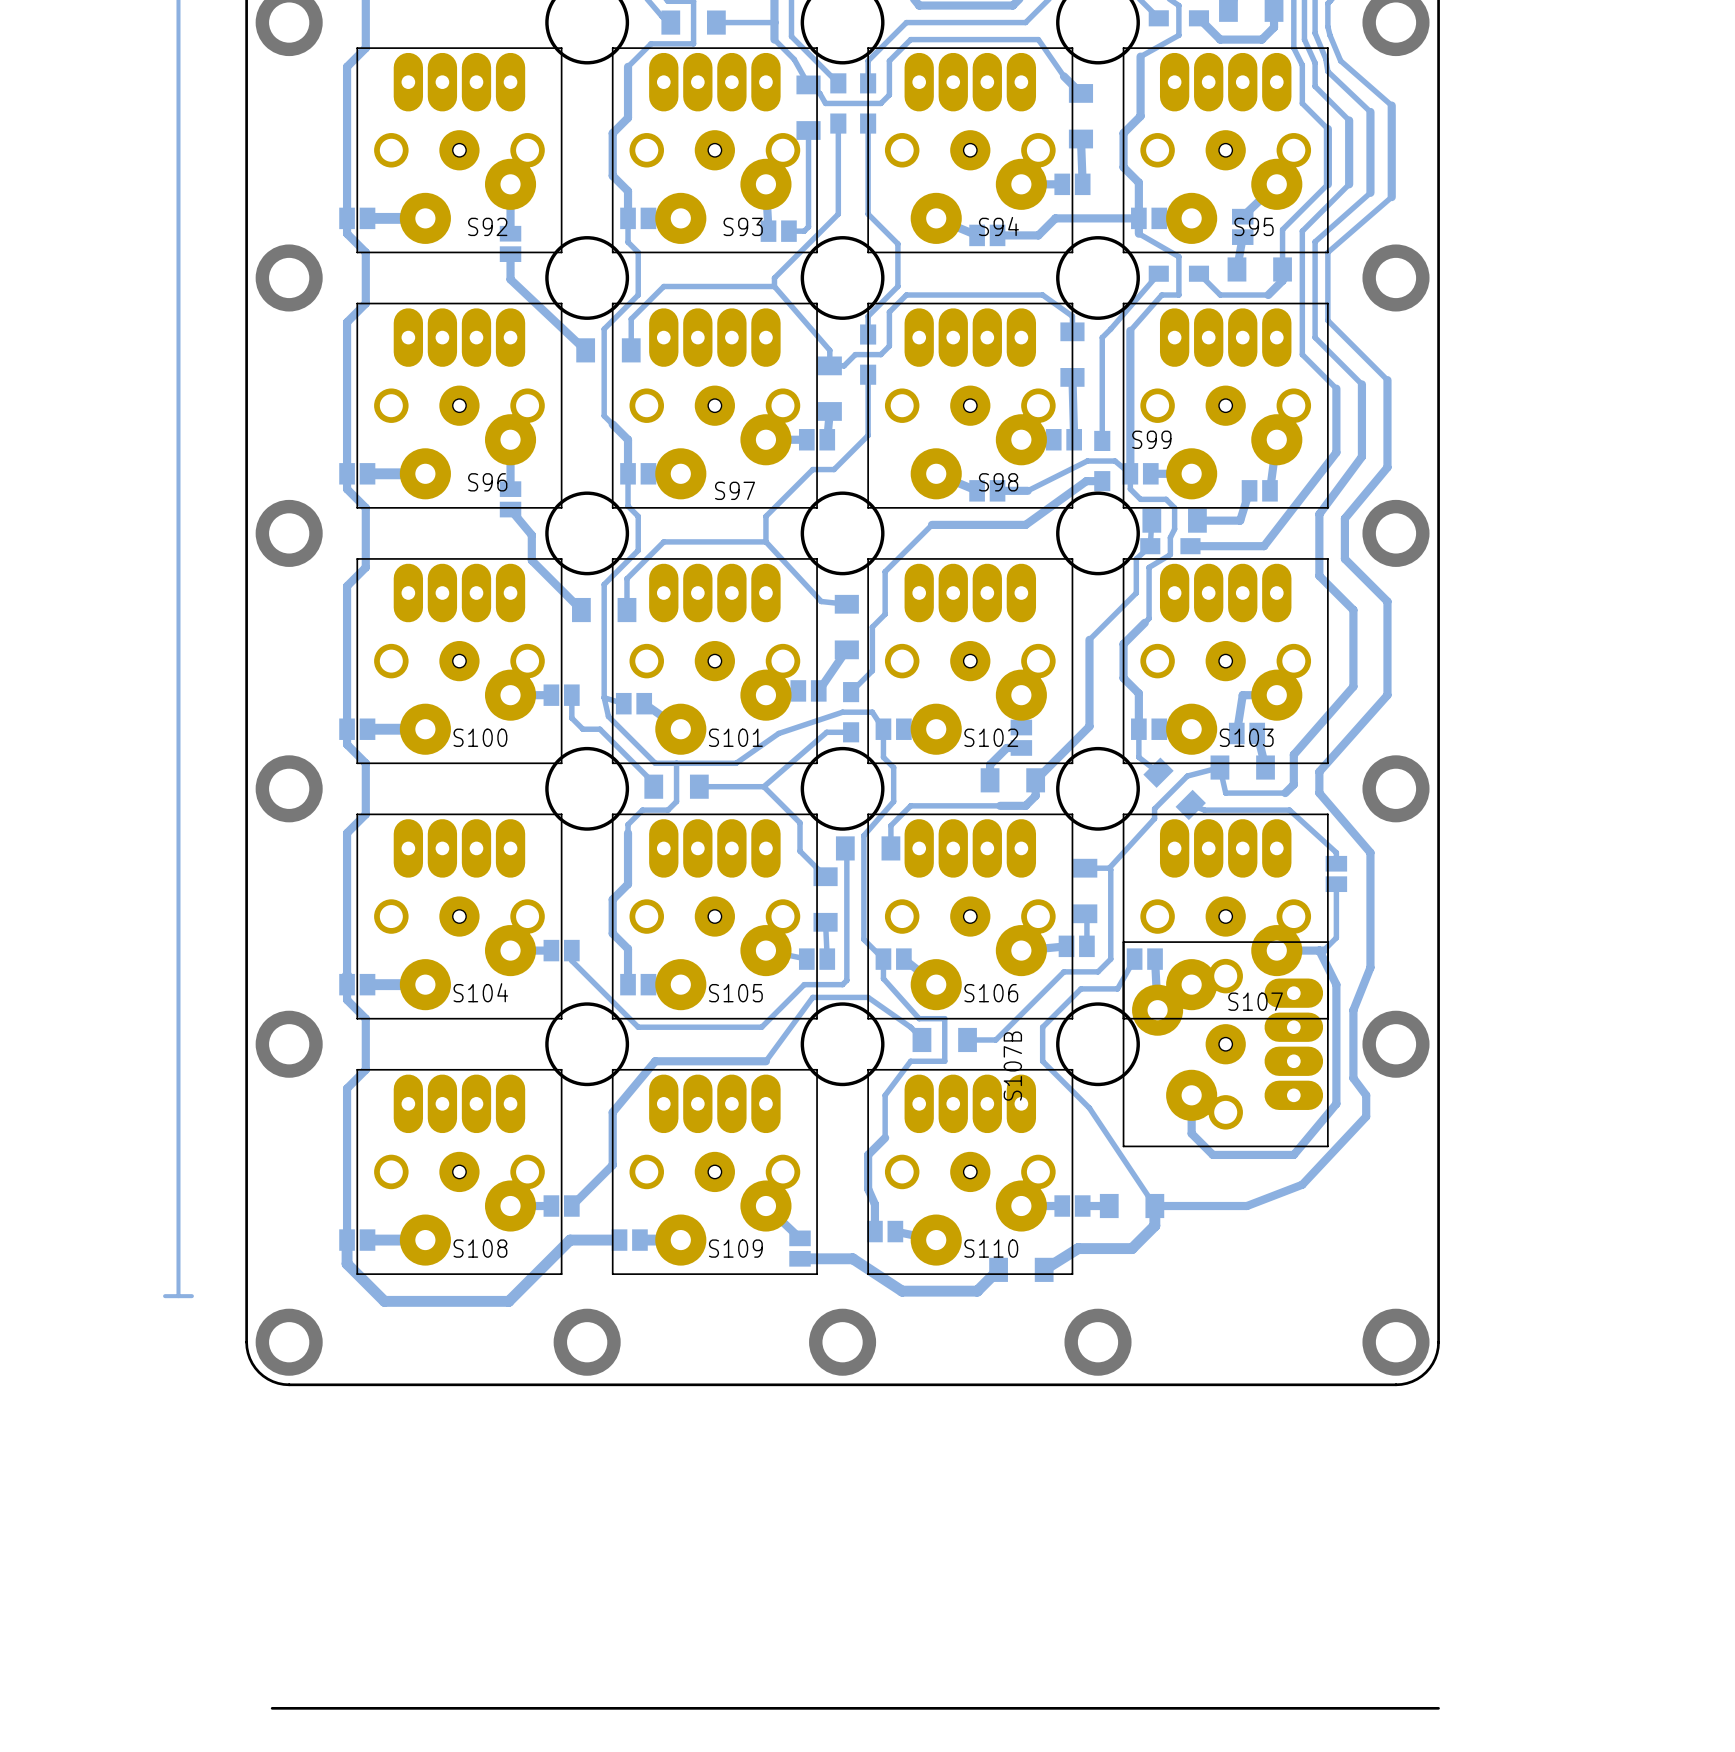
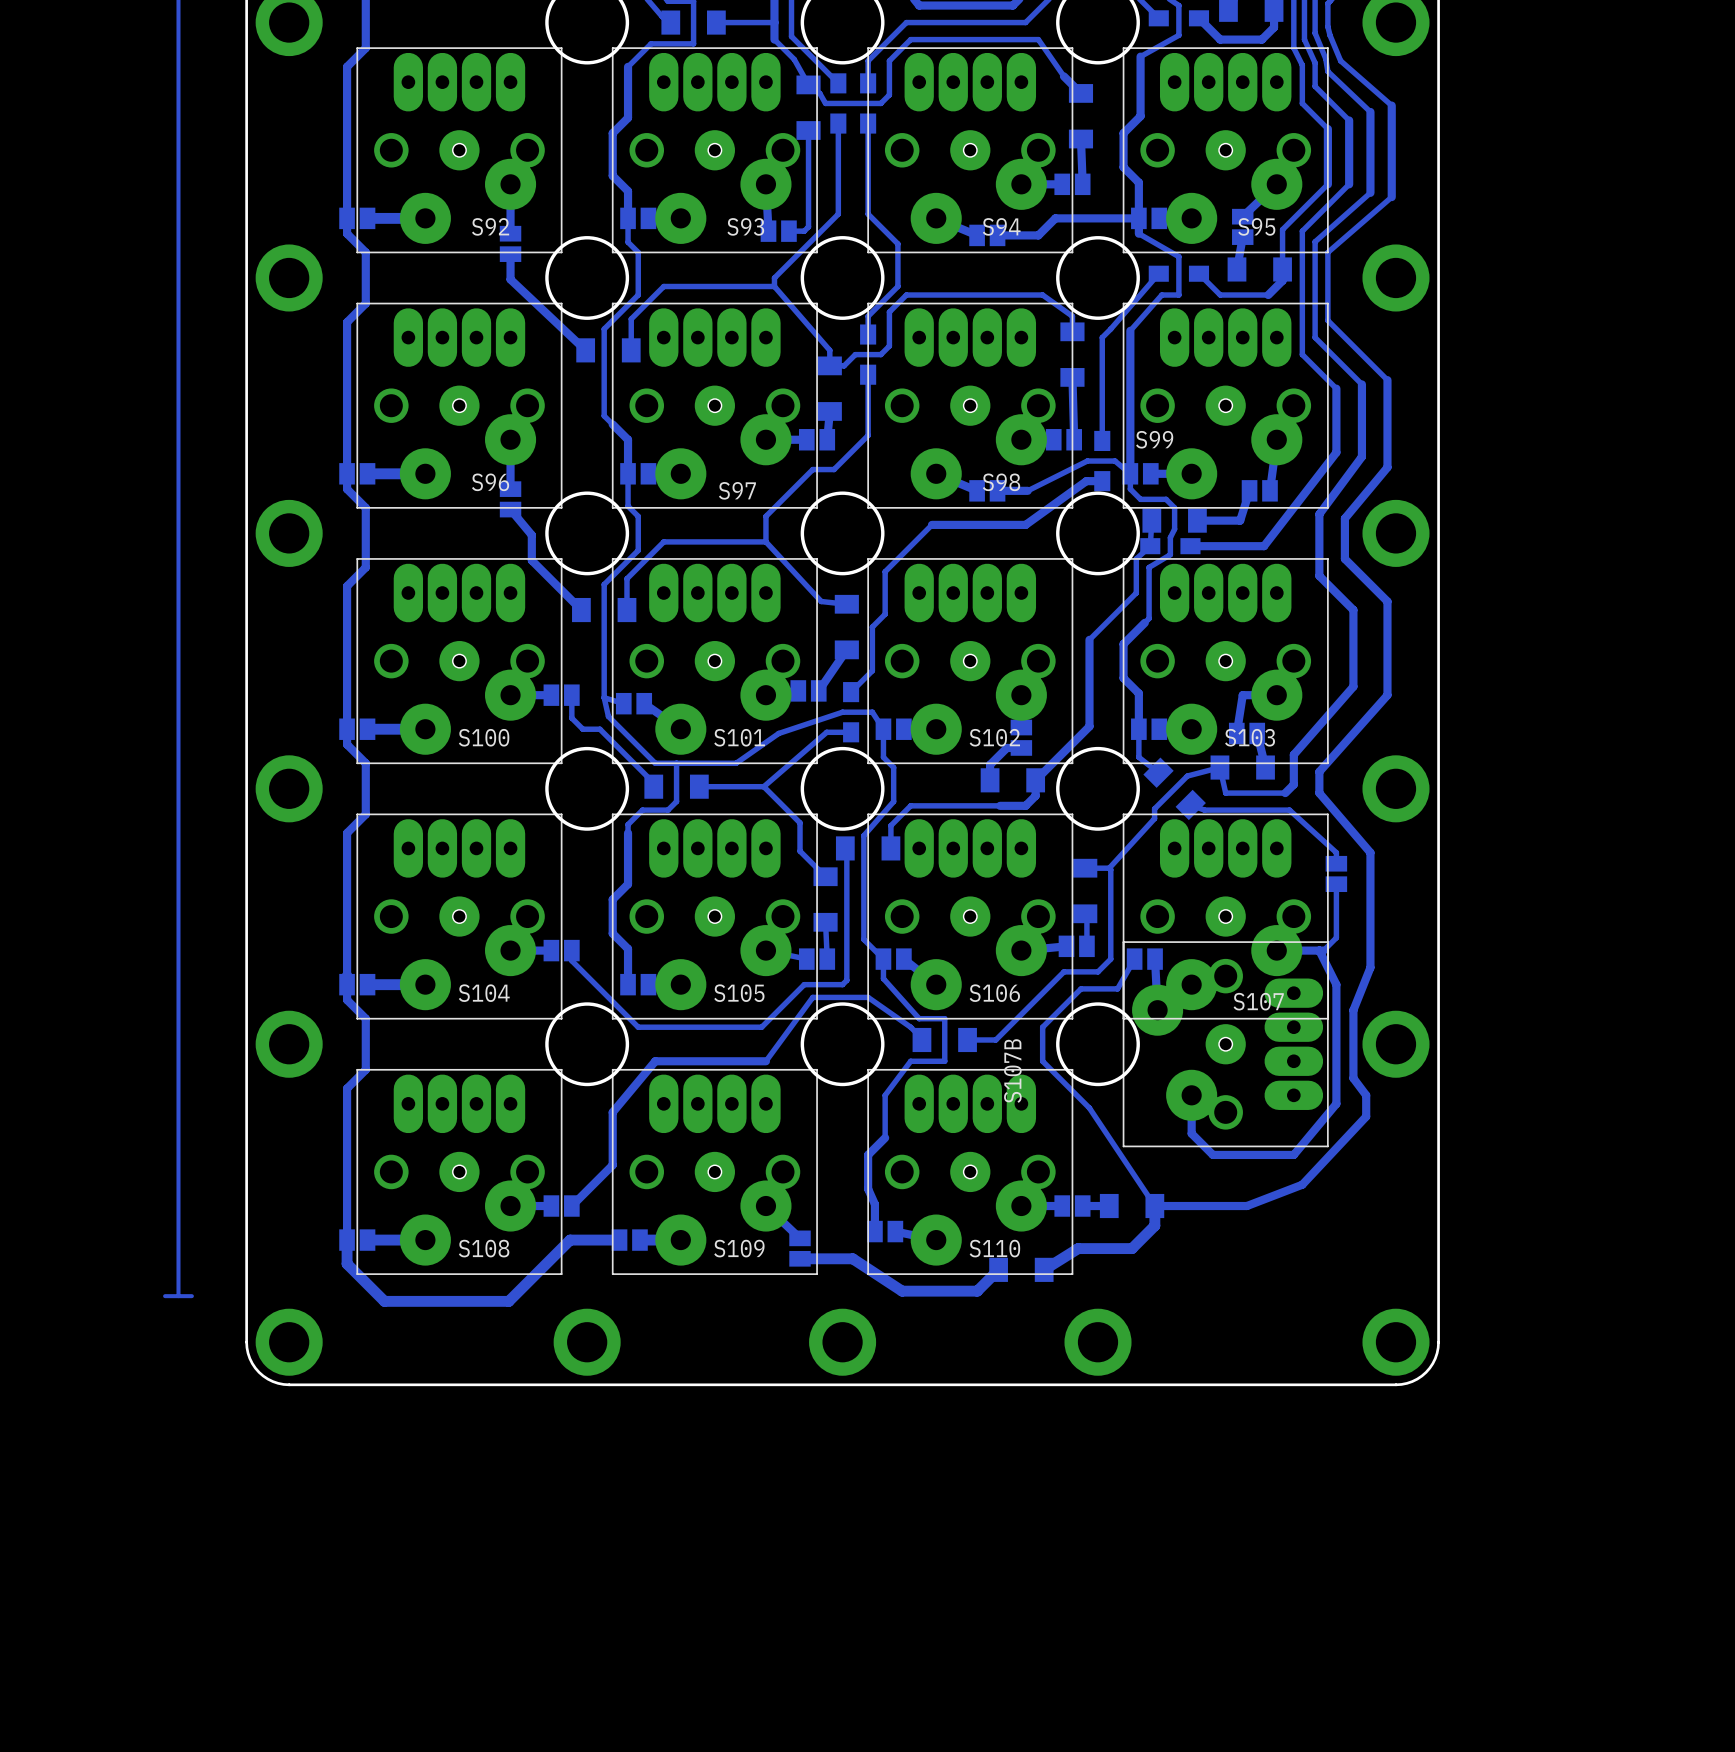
board edge: (272, 1708) (1438, 1708) -> none

